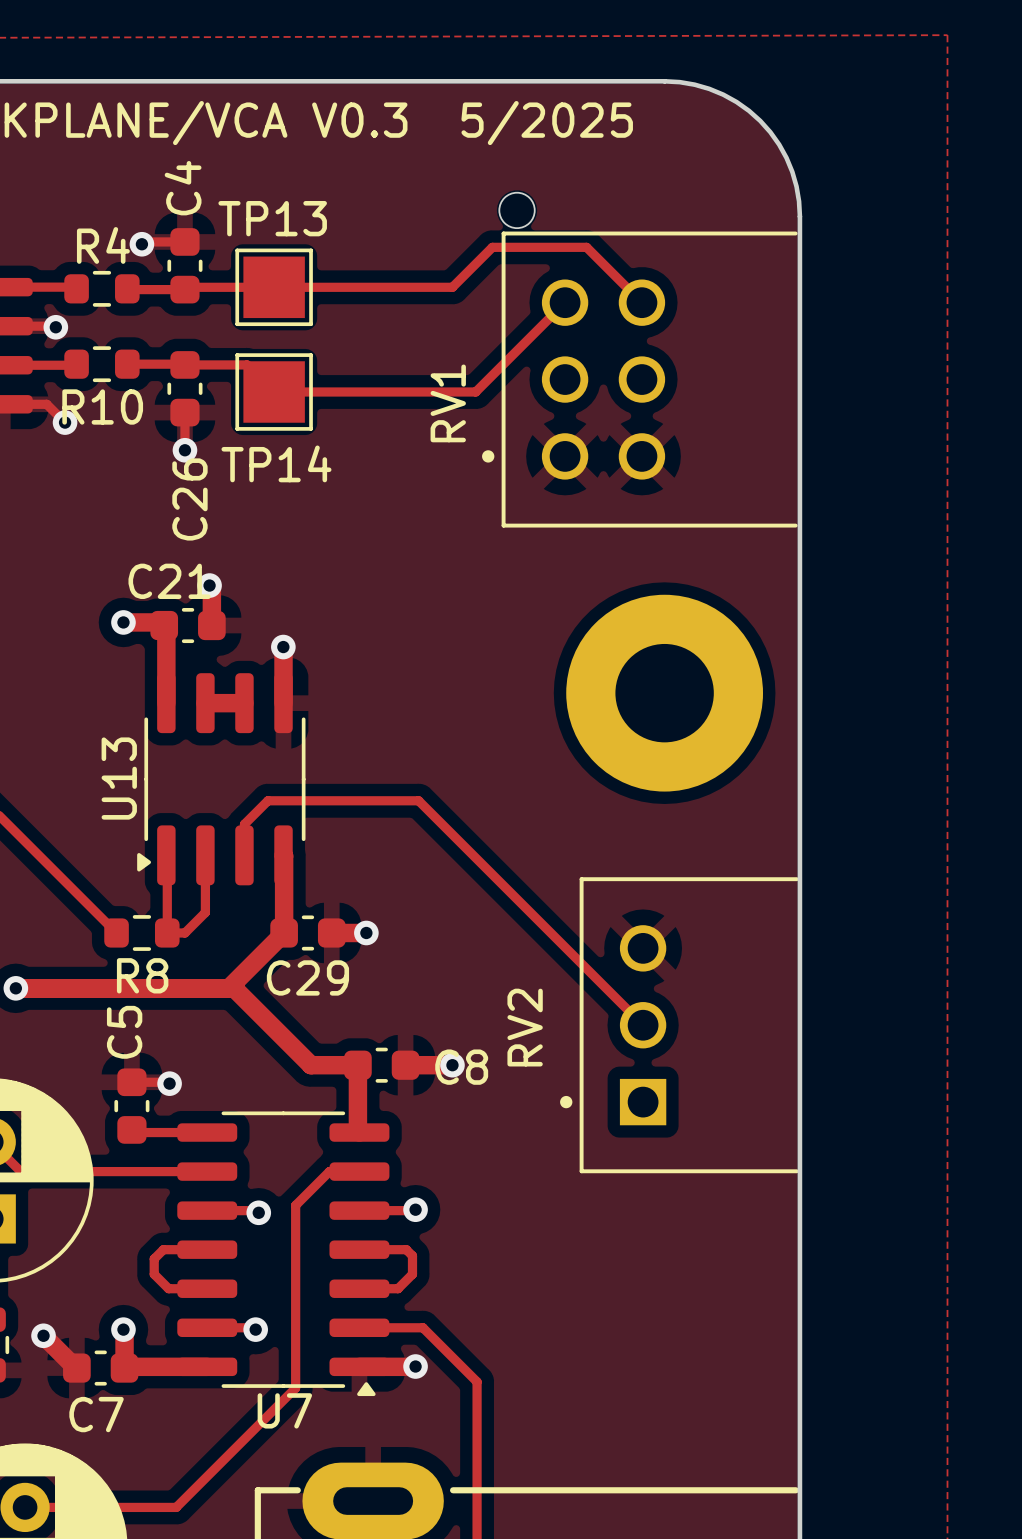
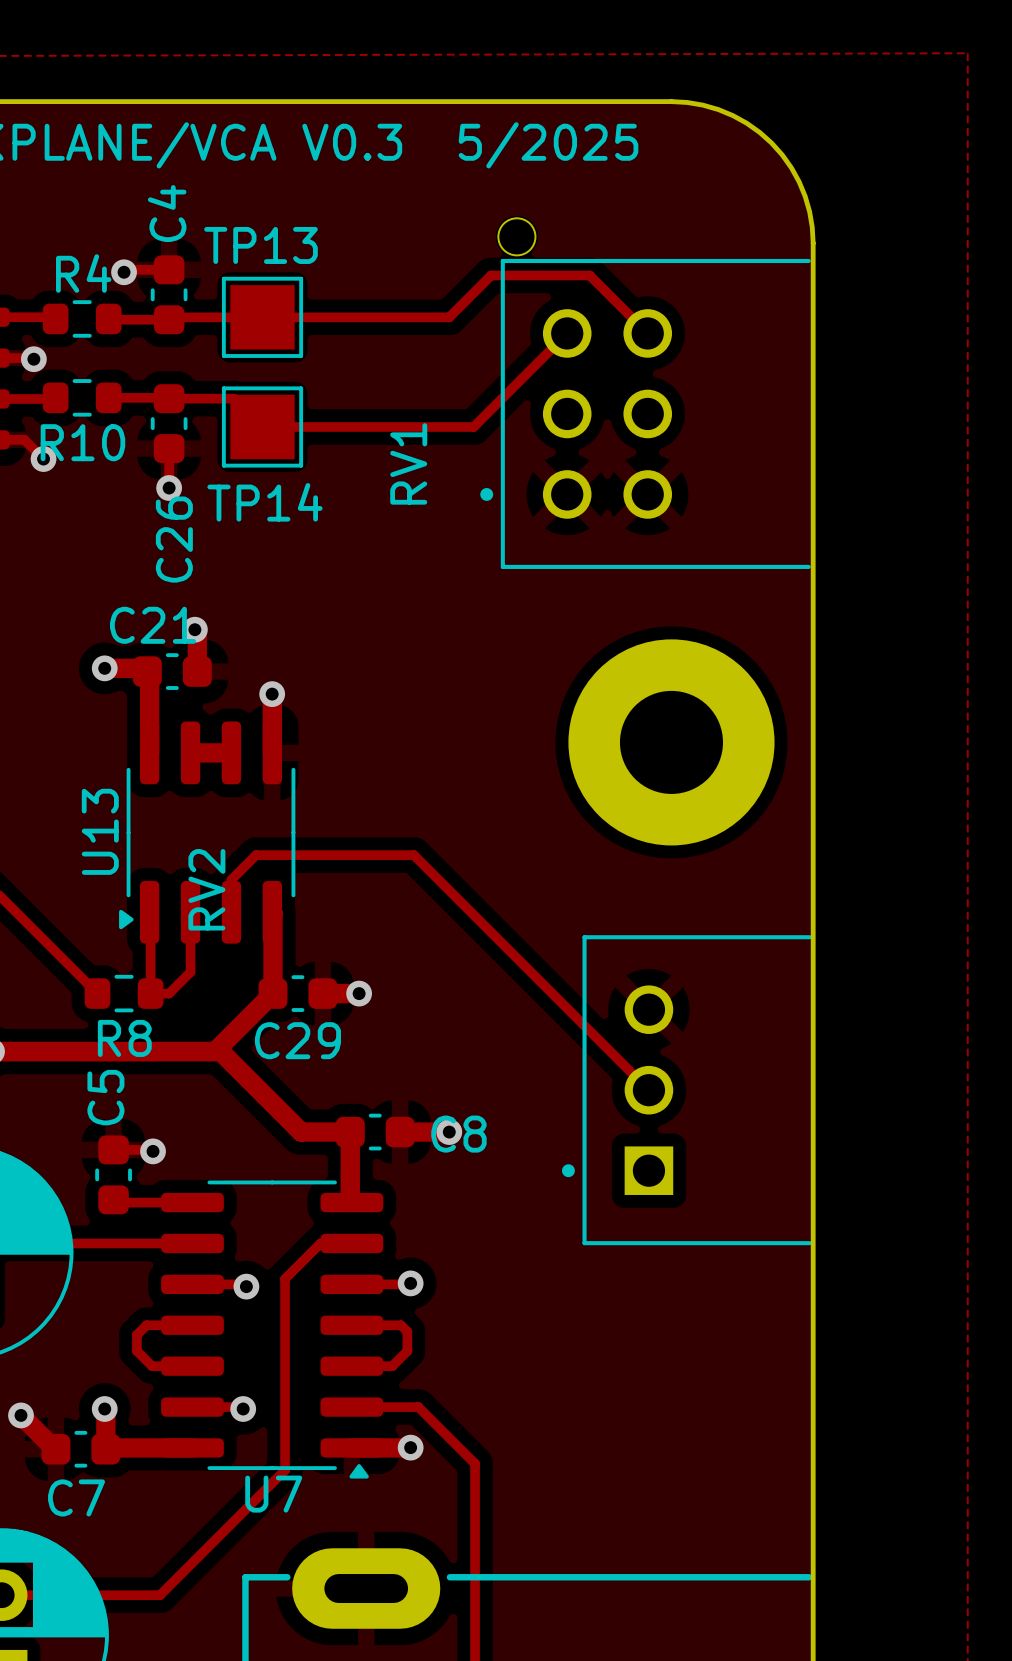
RV1 name position: RV1 (448, 403) -> RV1 (408, 463)
RV2 name position: RV2 (525, 1027) -> RV2 (206, 889)

